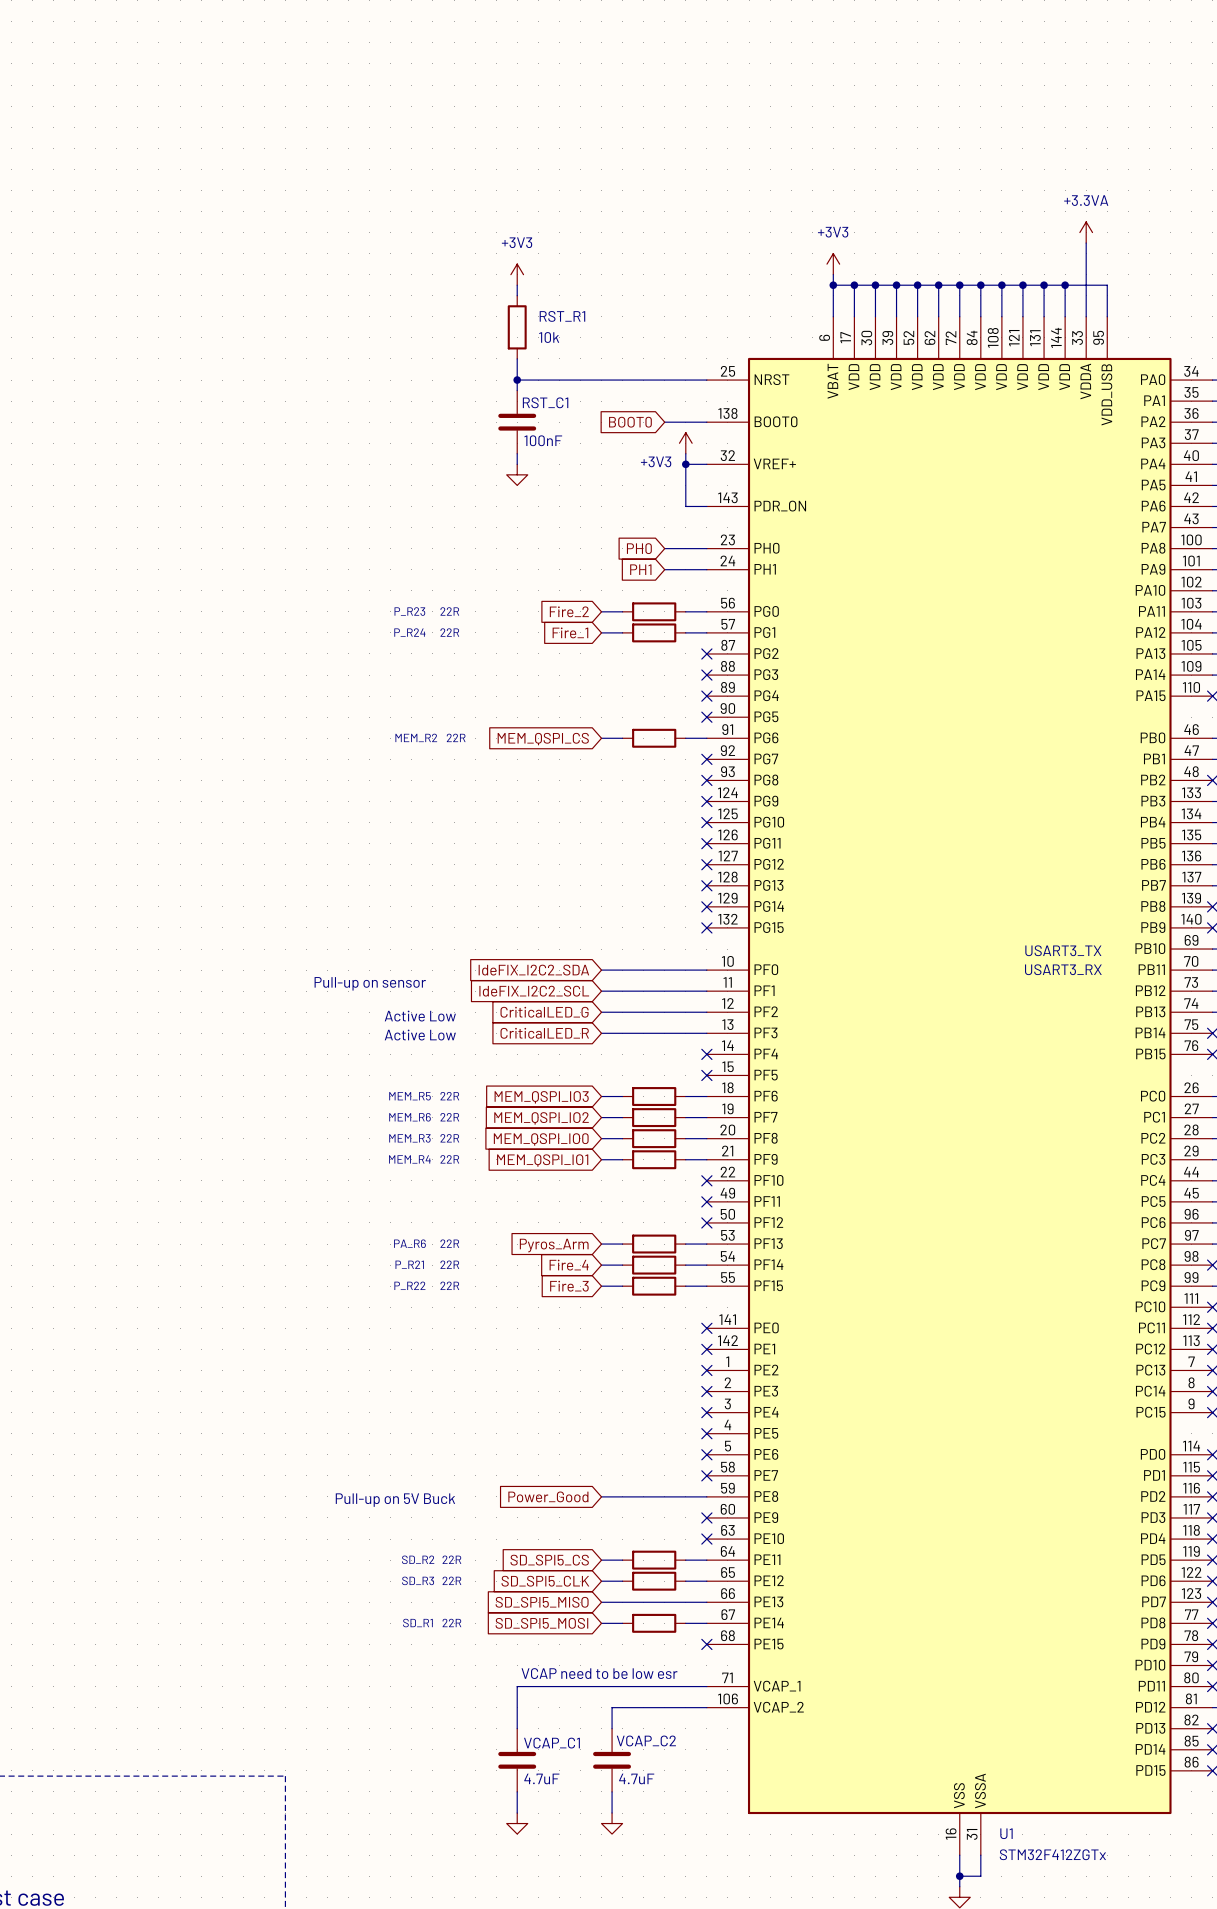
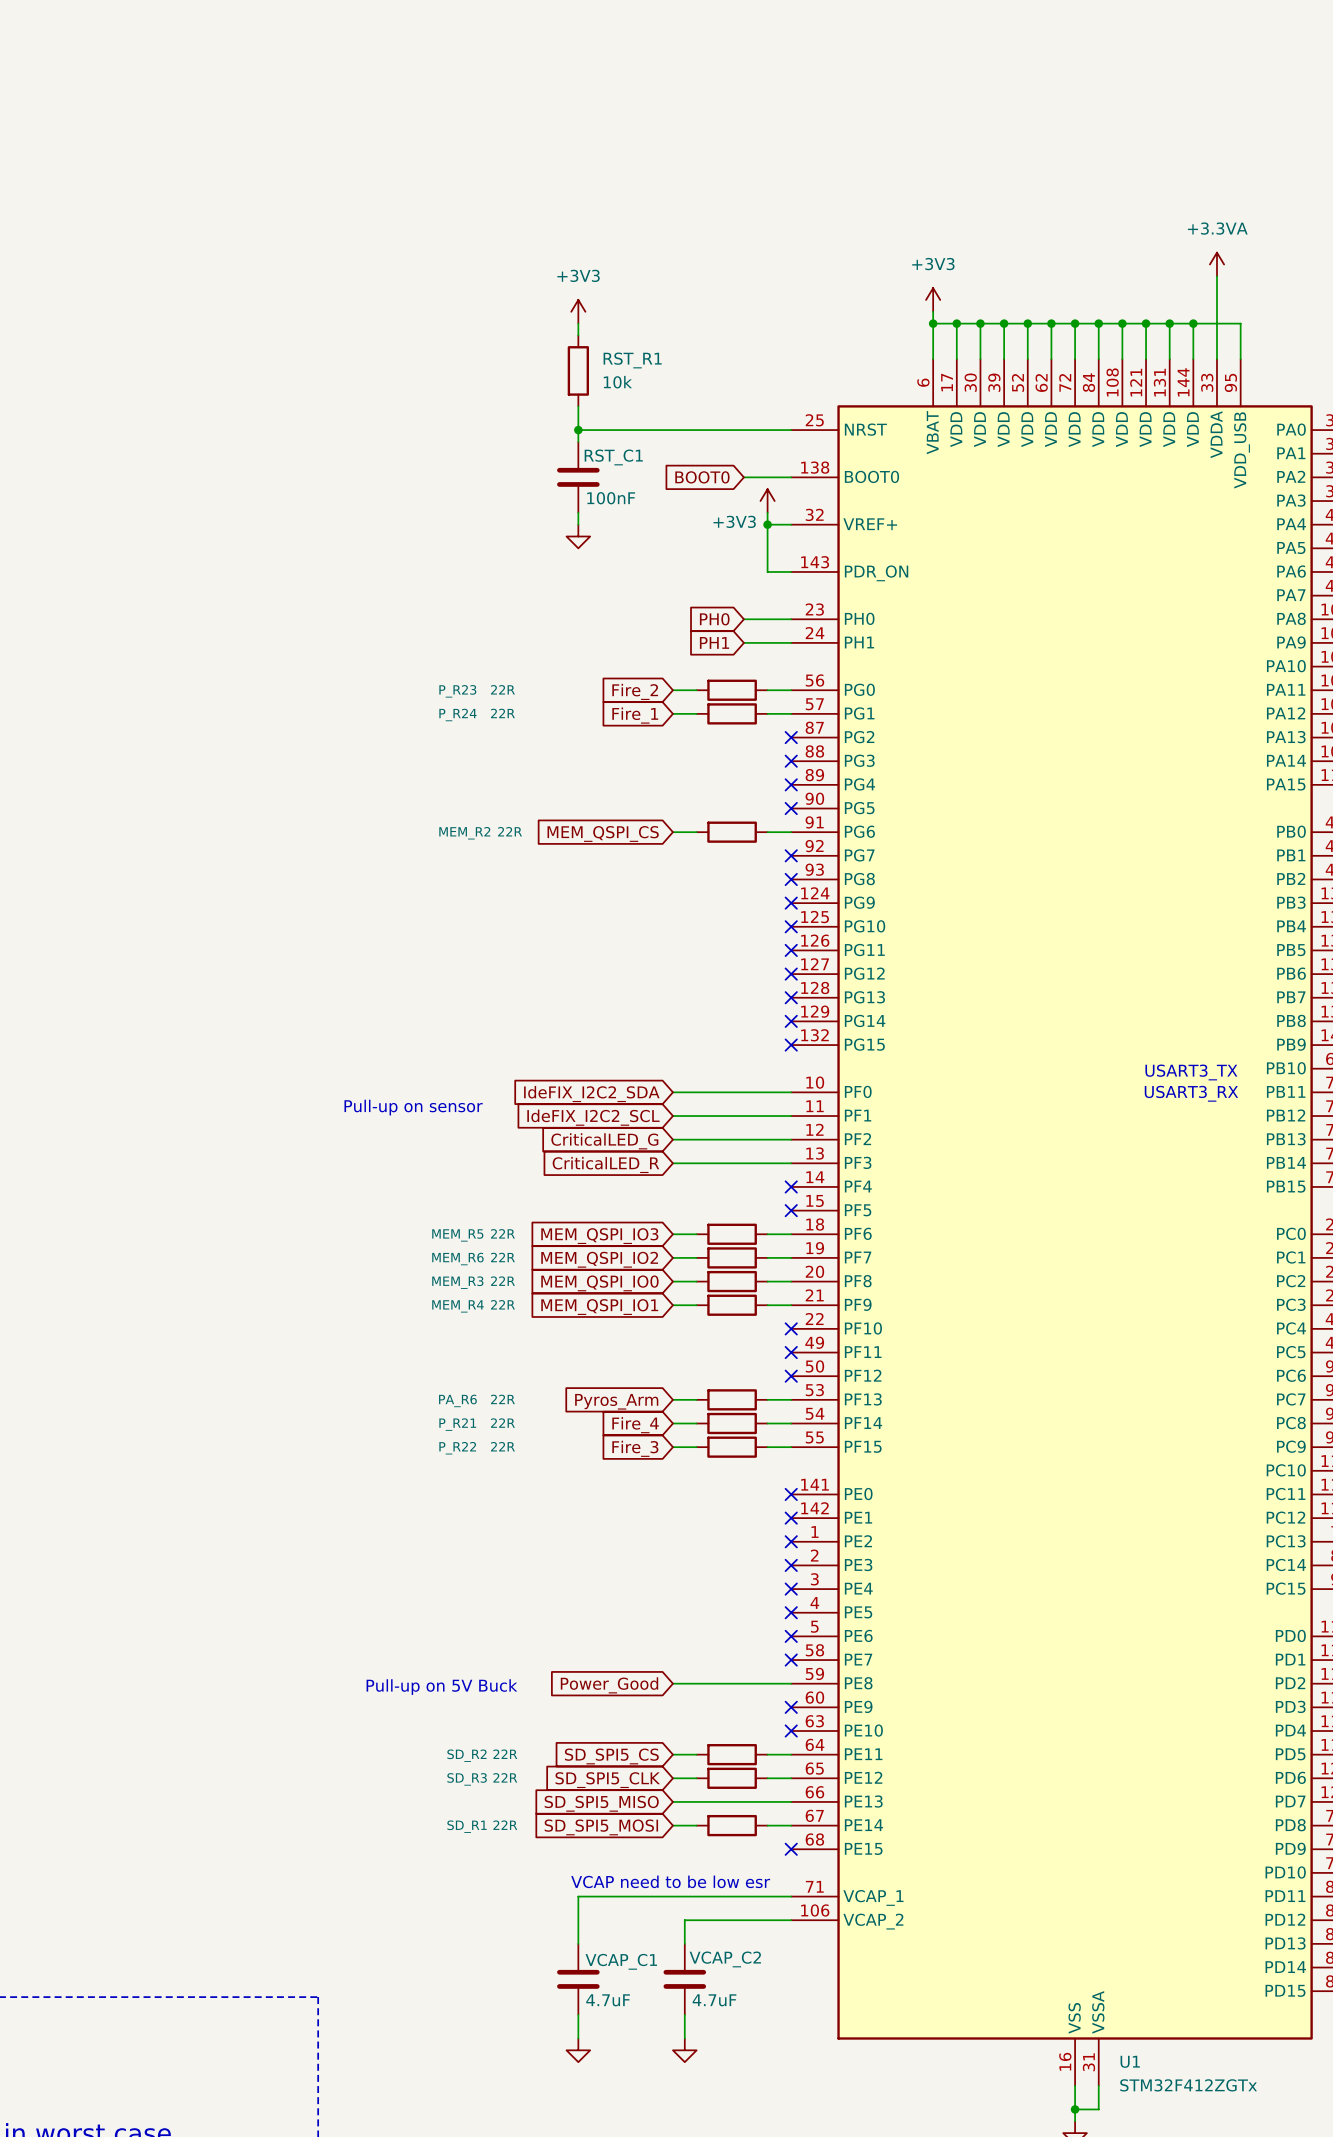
text: Active Low (420, 1016) -> none
text: Active Low (420, 1035) -> none

